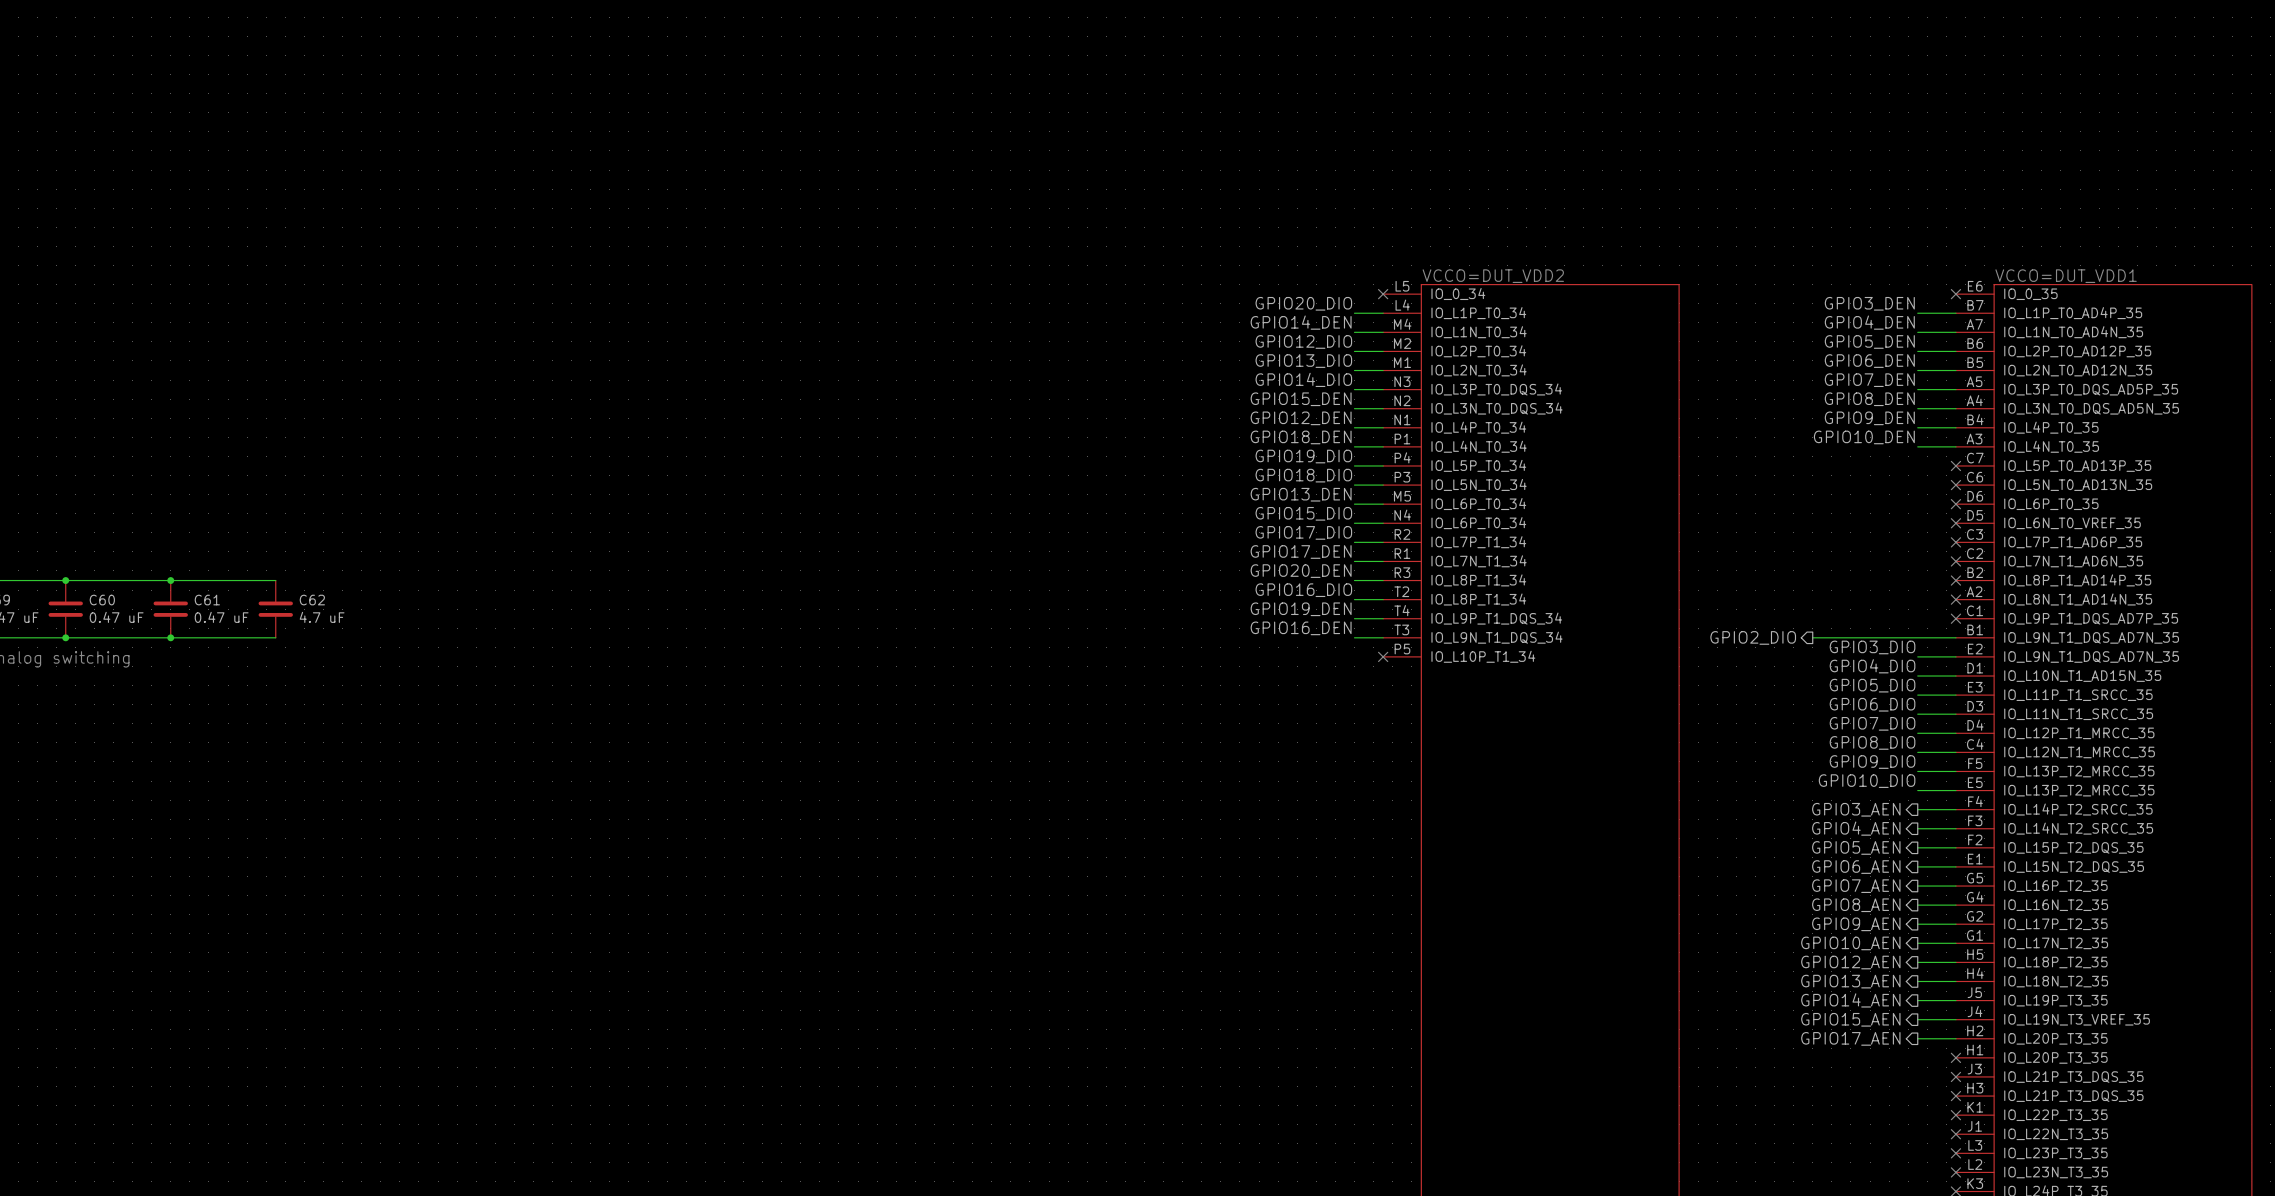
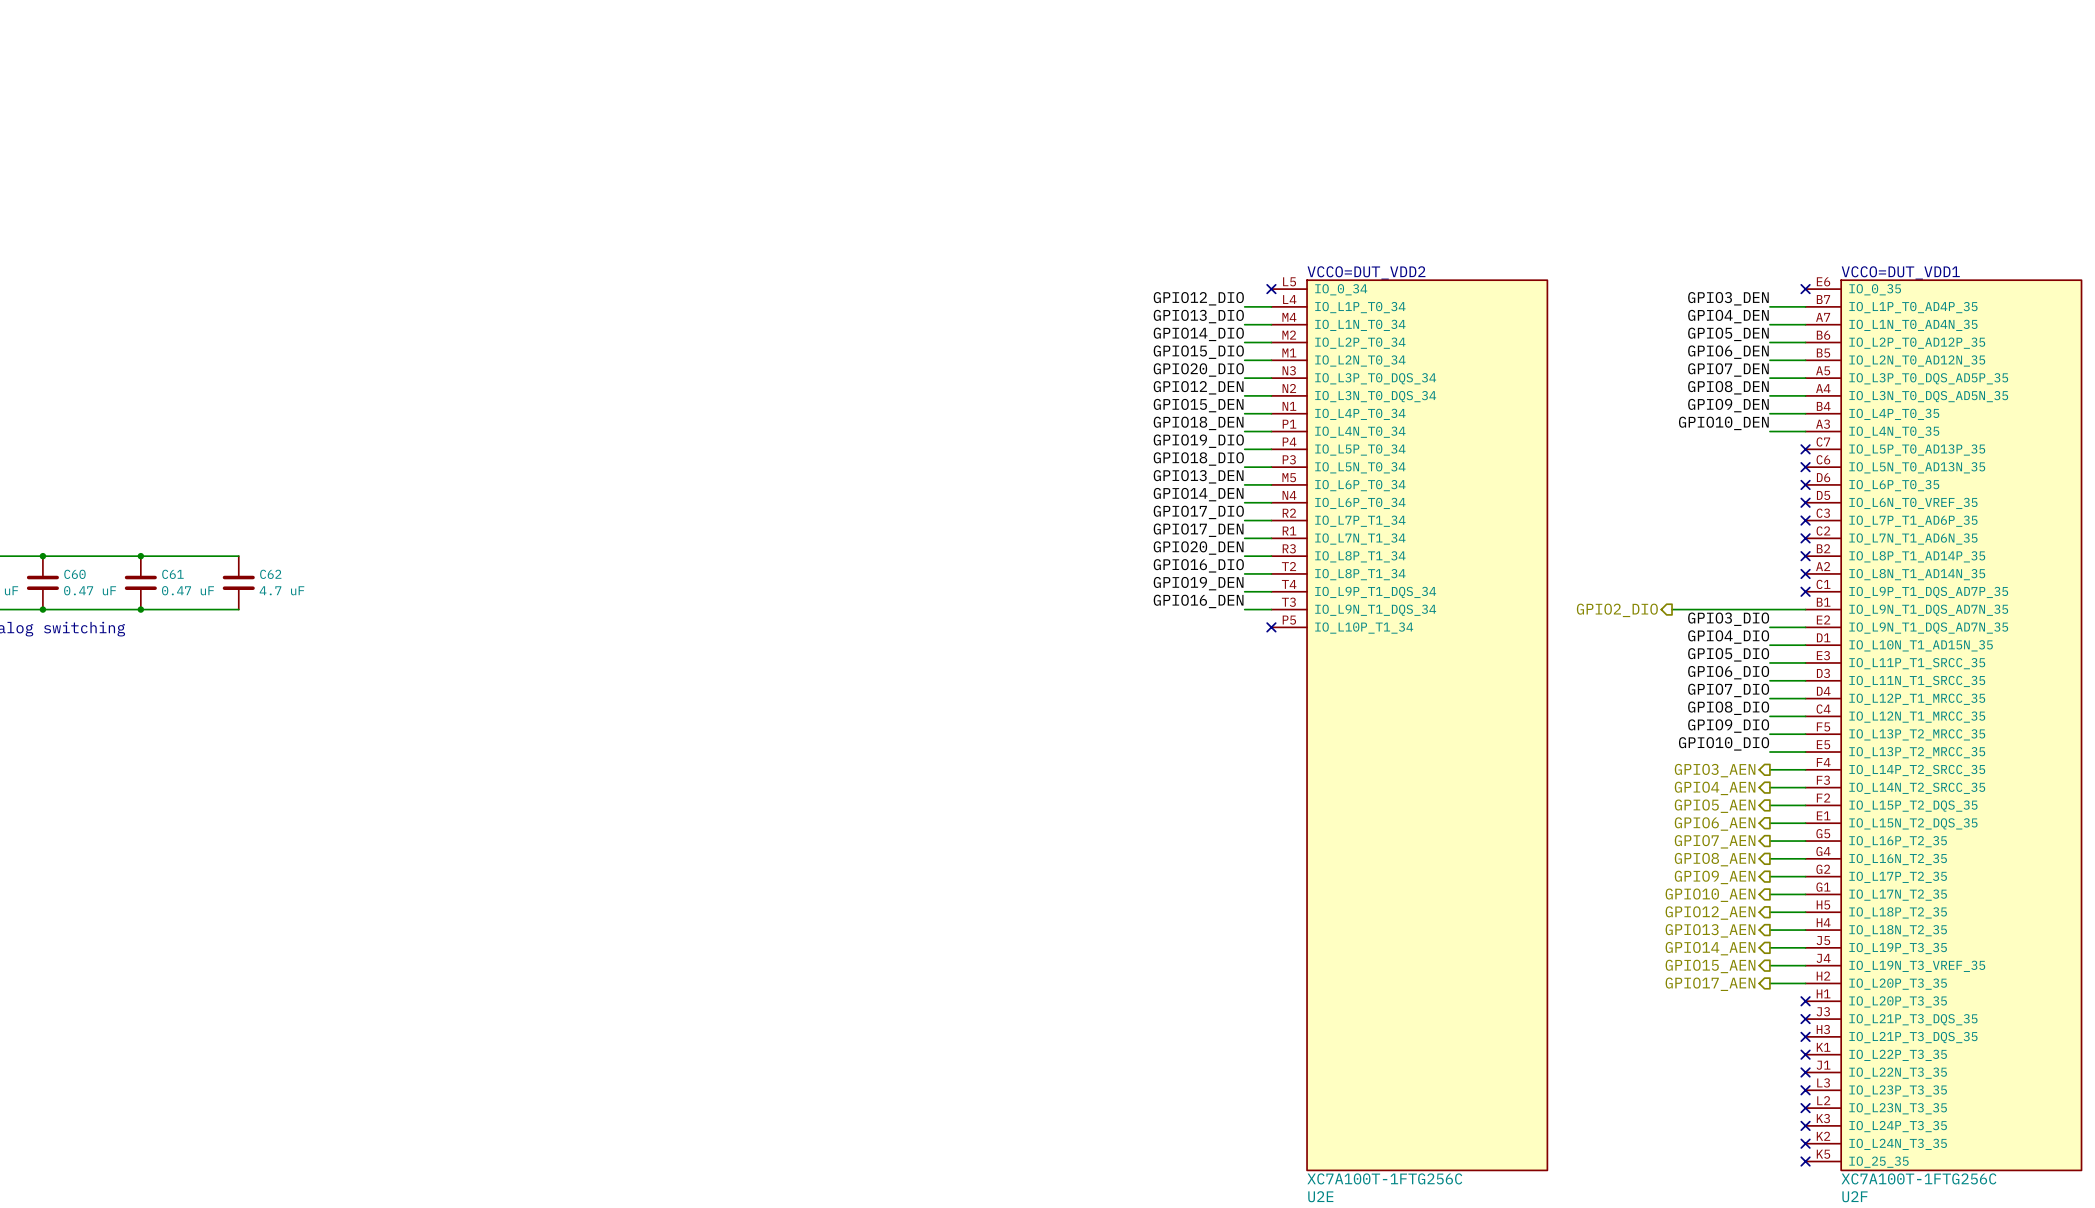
label: GPIO20_DIO (1303, 303) -> GPIO12_DIO (1198, 298)
label: GPIO14_DEN (1301, 322) -> GPIO13_DIO (1198, 316)
label: GPIO12_DIO (1303, 341) -> GPIO14_DIO (1198, 334)
label: GPIO13_DIO (1303, 361) -> GPIO15_DIO (1198, 352)
label: GPIO14_DIO (1303, 379) -> GPIO20_DIO (1198, 369)
label: GPIO15_DEN (1301, 399) -> GPIO12_DEN (1198, 387)
label: GPIO12_DEN (1301, 418) -> GPIO15_DEN (1198, 405)
label: GPIO15_DIO (1303, 513) -> GPIO14_DEN (1198, 494)

